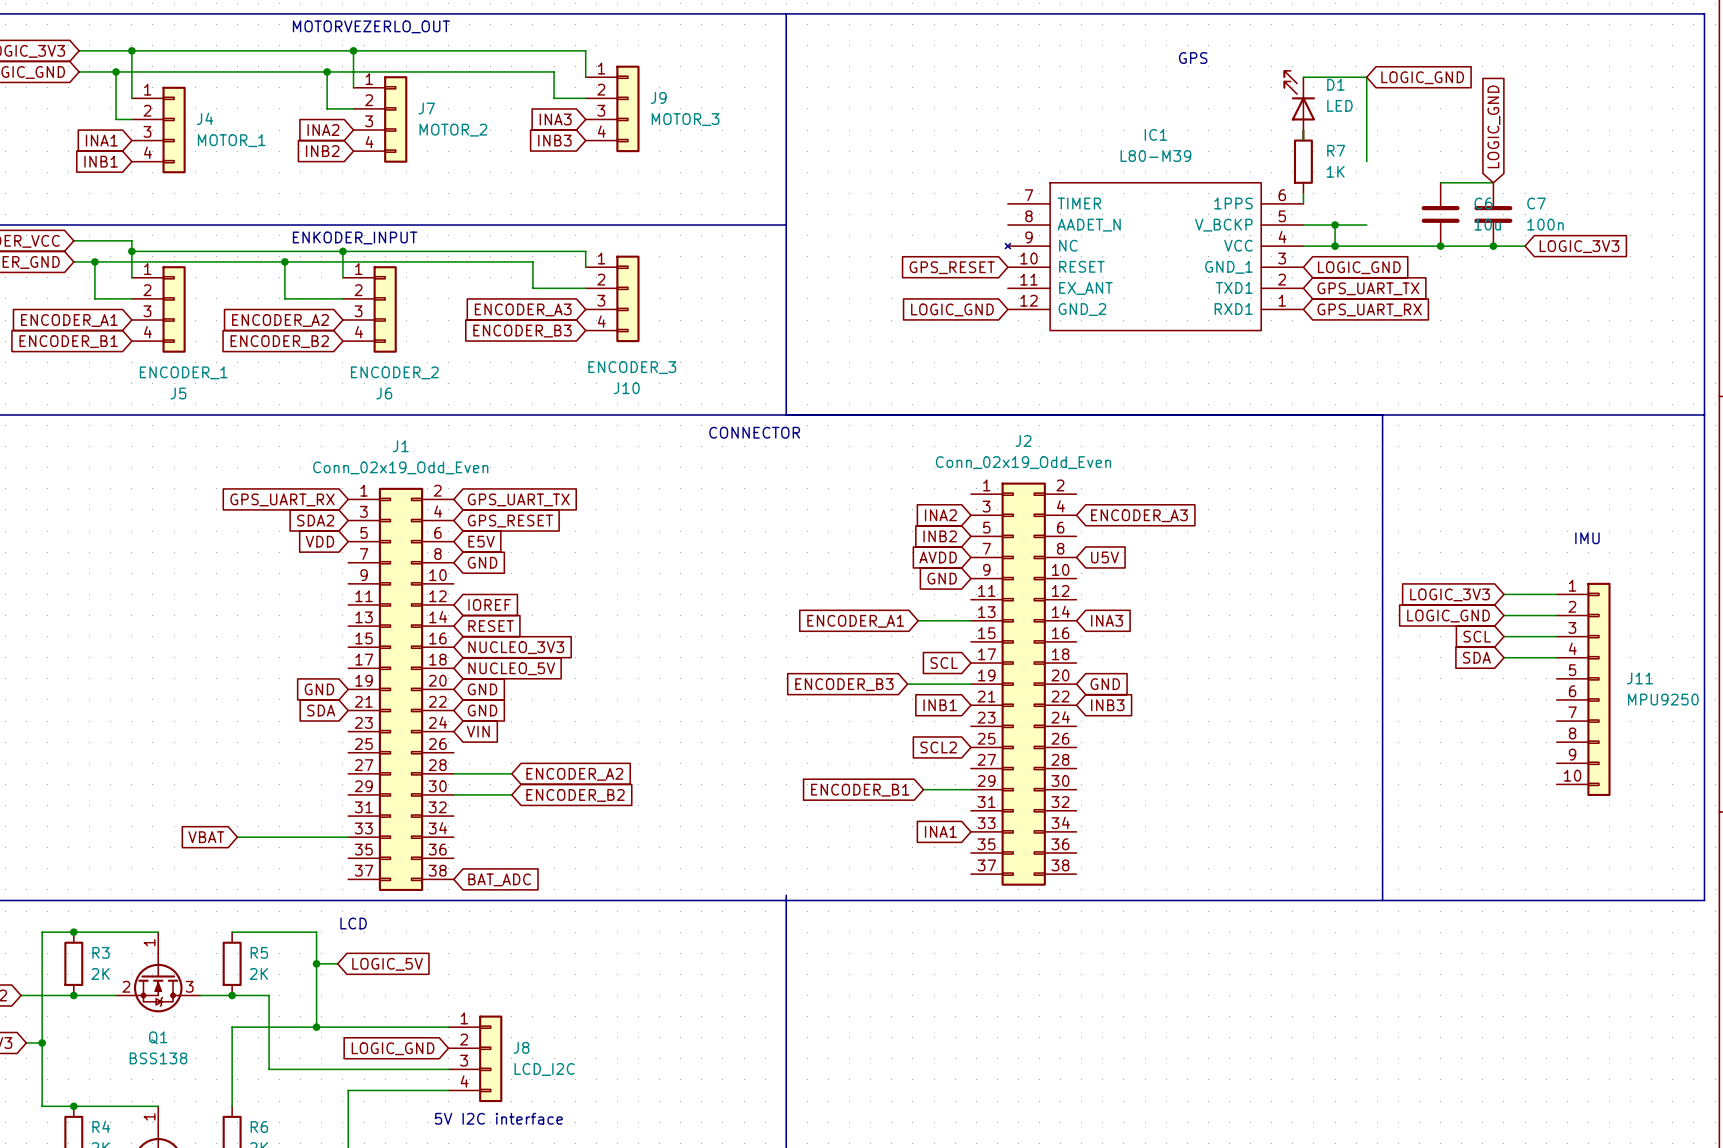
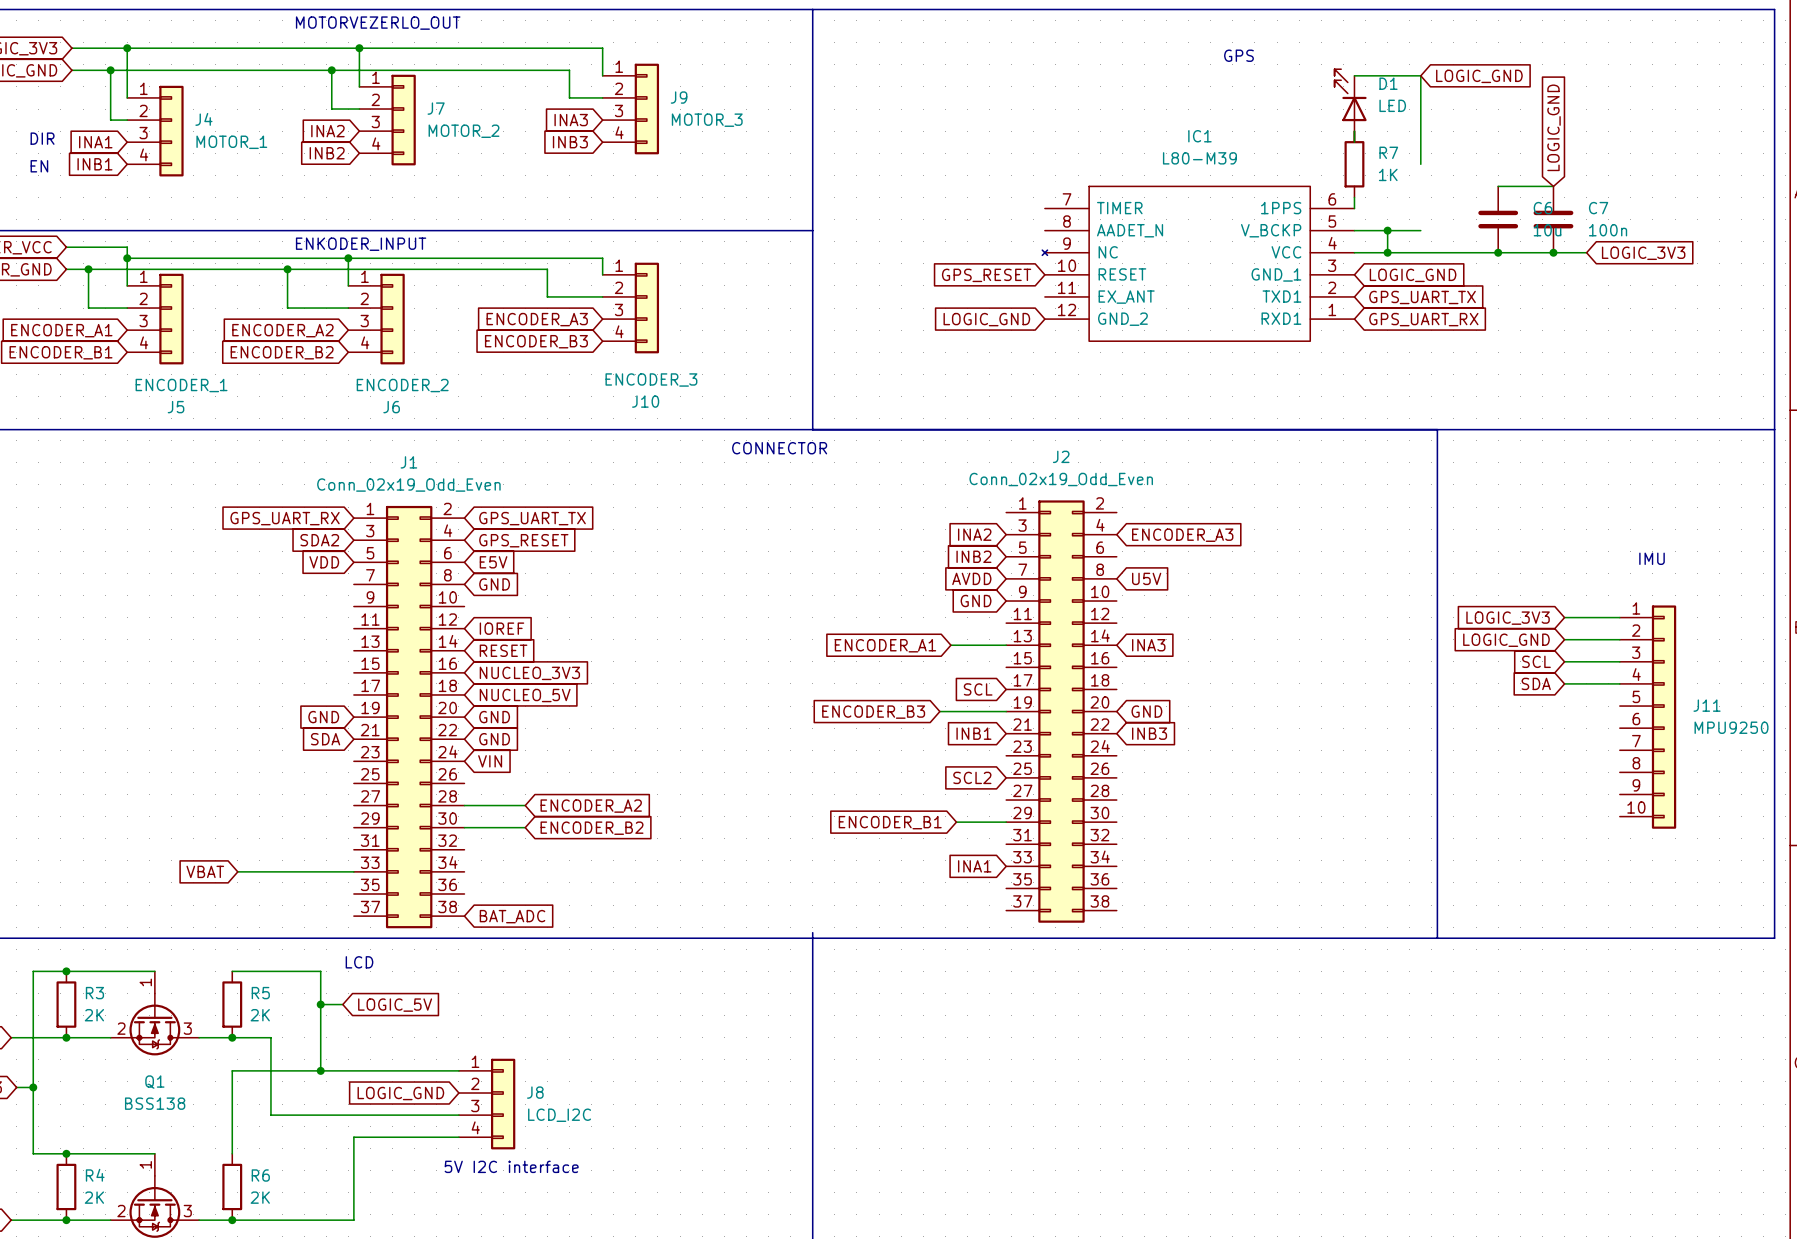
text: none -> DIR (42, 138)
text: none -> EN (39, 166)

